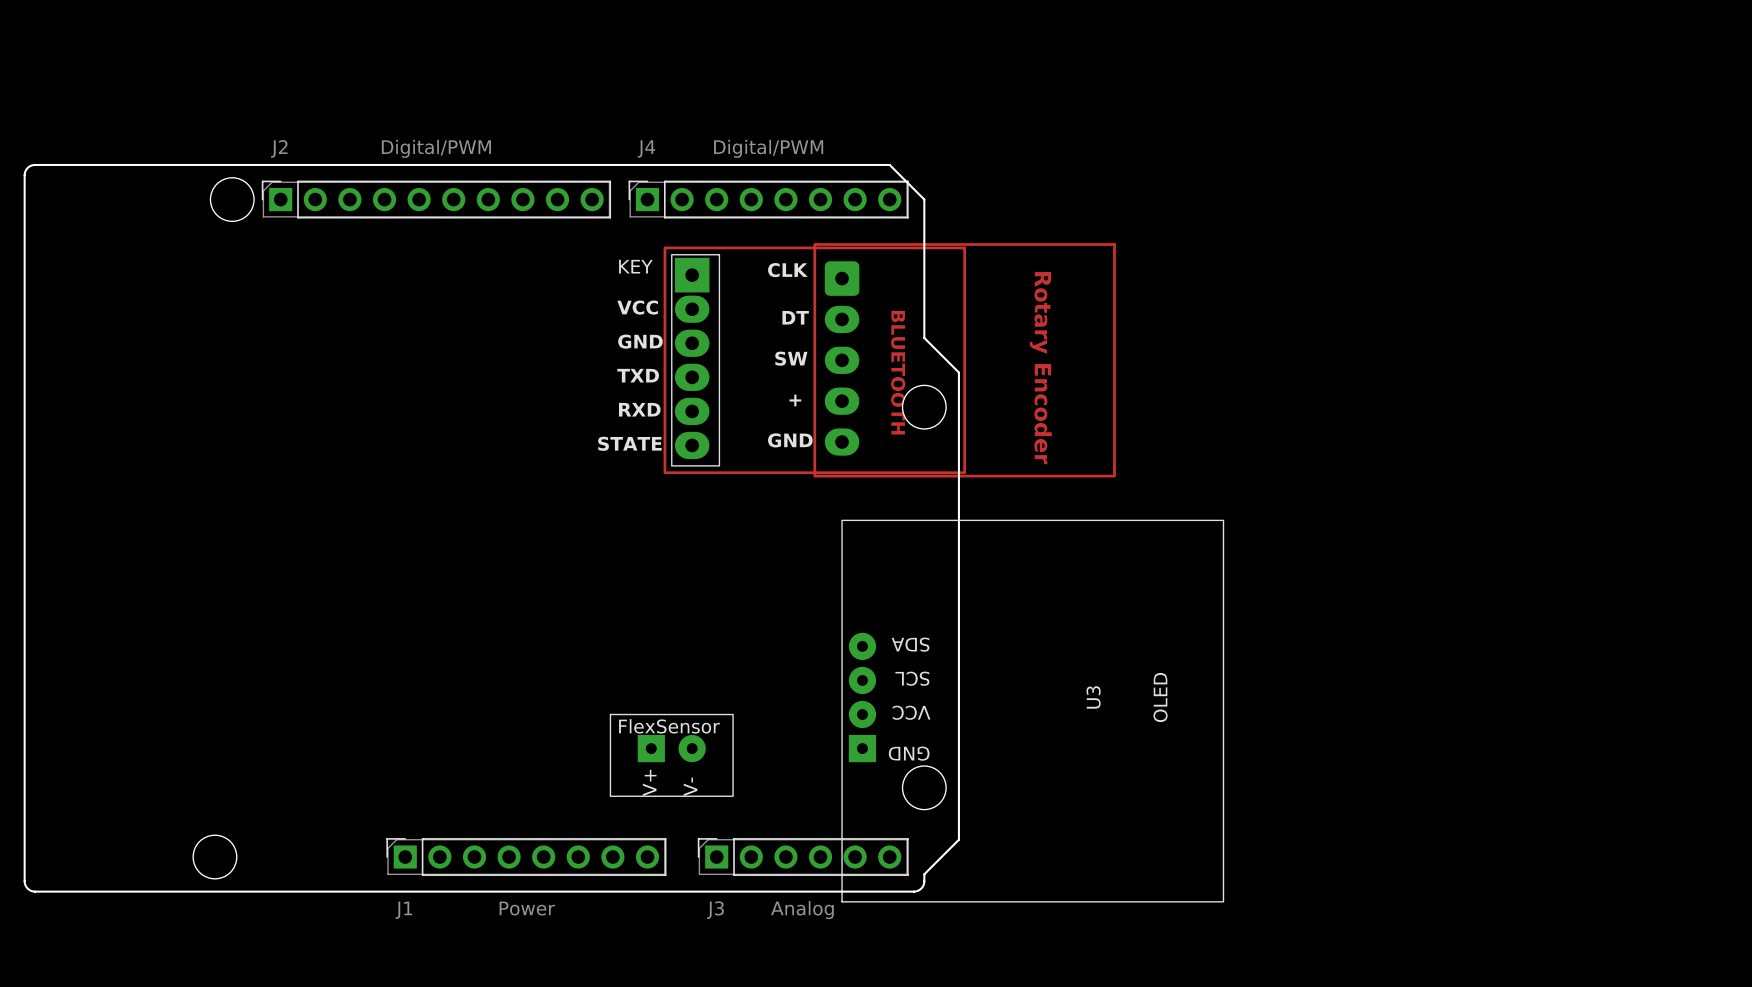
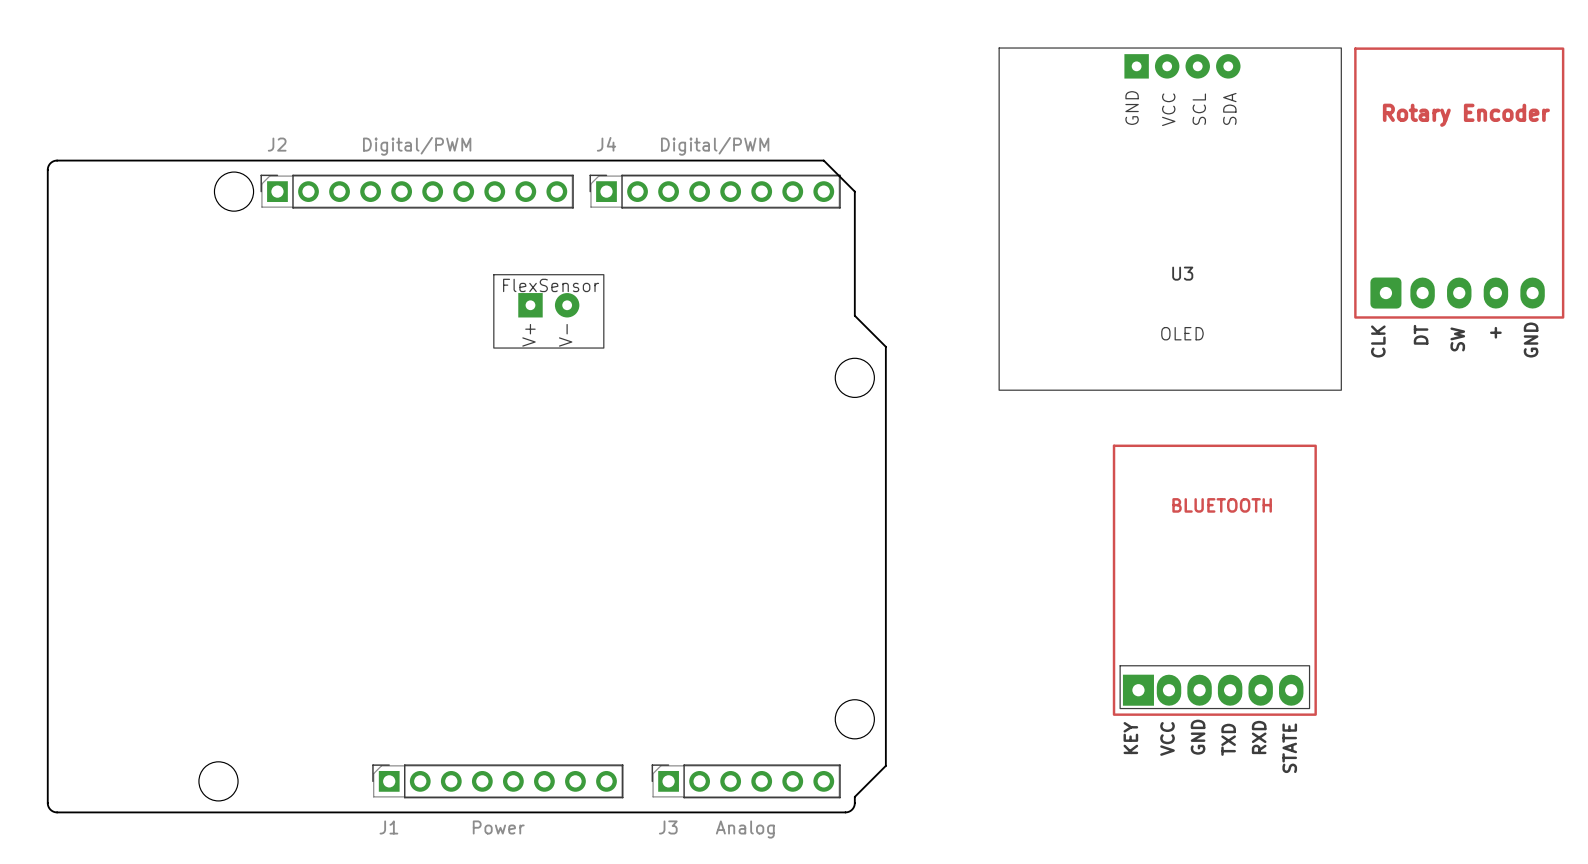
part: none -> (1459, 183)
part: none -> (548, 311)
part: (814, 360) -> none
part: (964, 360) -> none
part: none -> (1214, 580)
U3 rotation: 0° (1032, 711) -> 90° clockwise (1170, 219)
U3 position: (1032, 711) -> (1170, 219)
part: (671, 755) -> none

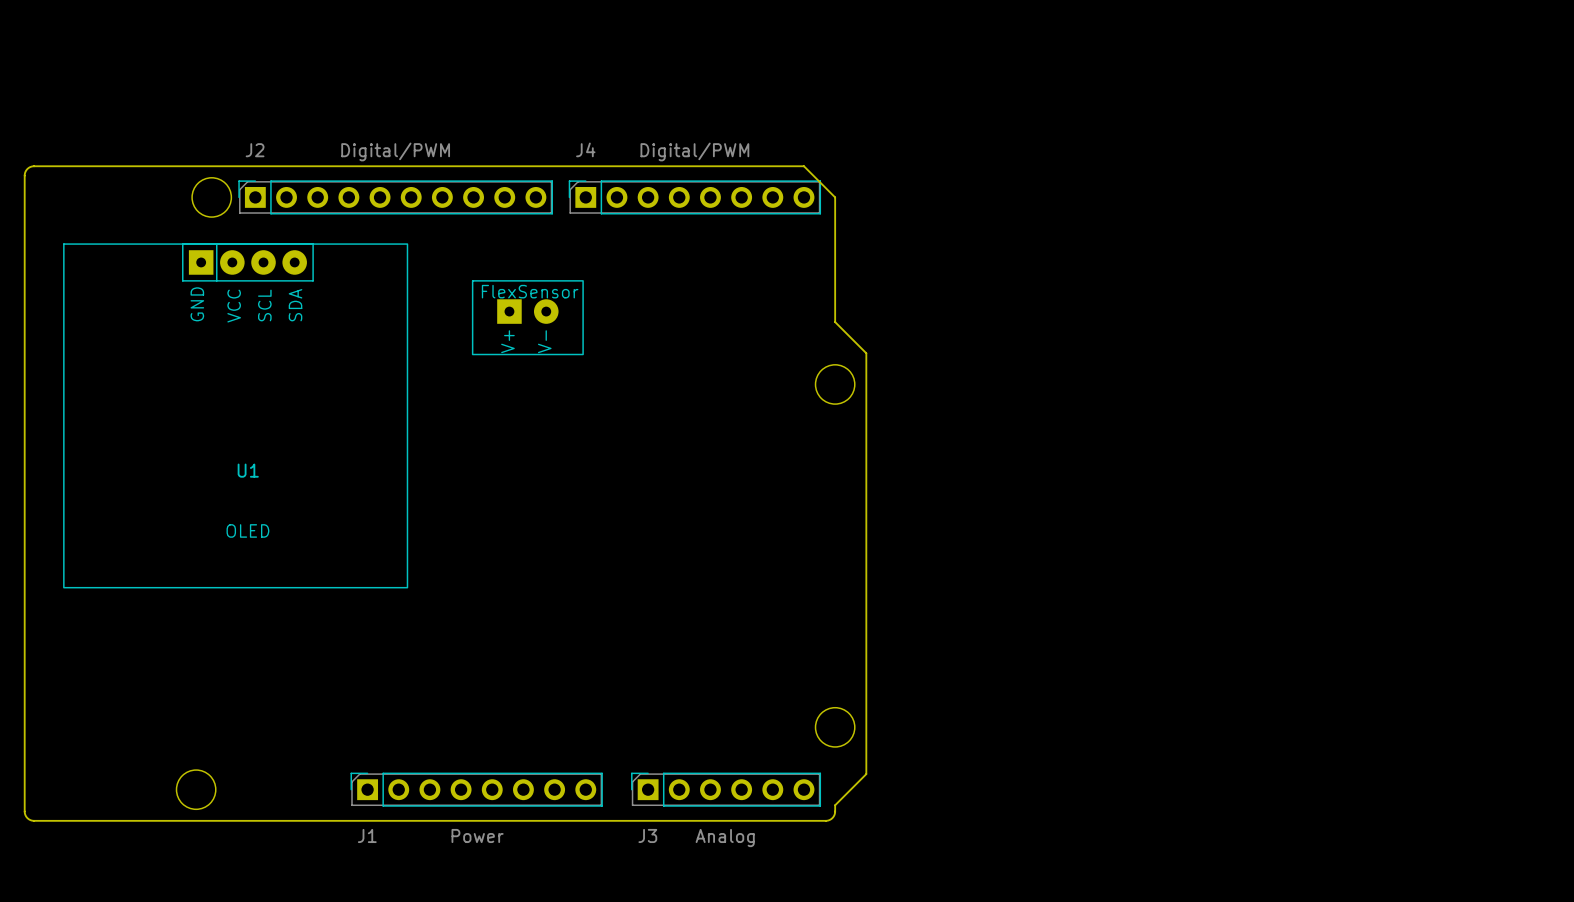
part: (1459, 183) -> none
U3: (1170, 219) -> none
U1: none -> (235, 415)
part: (1214, 580) -> none

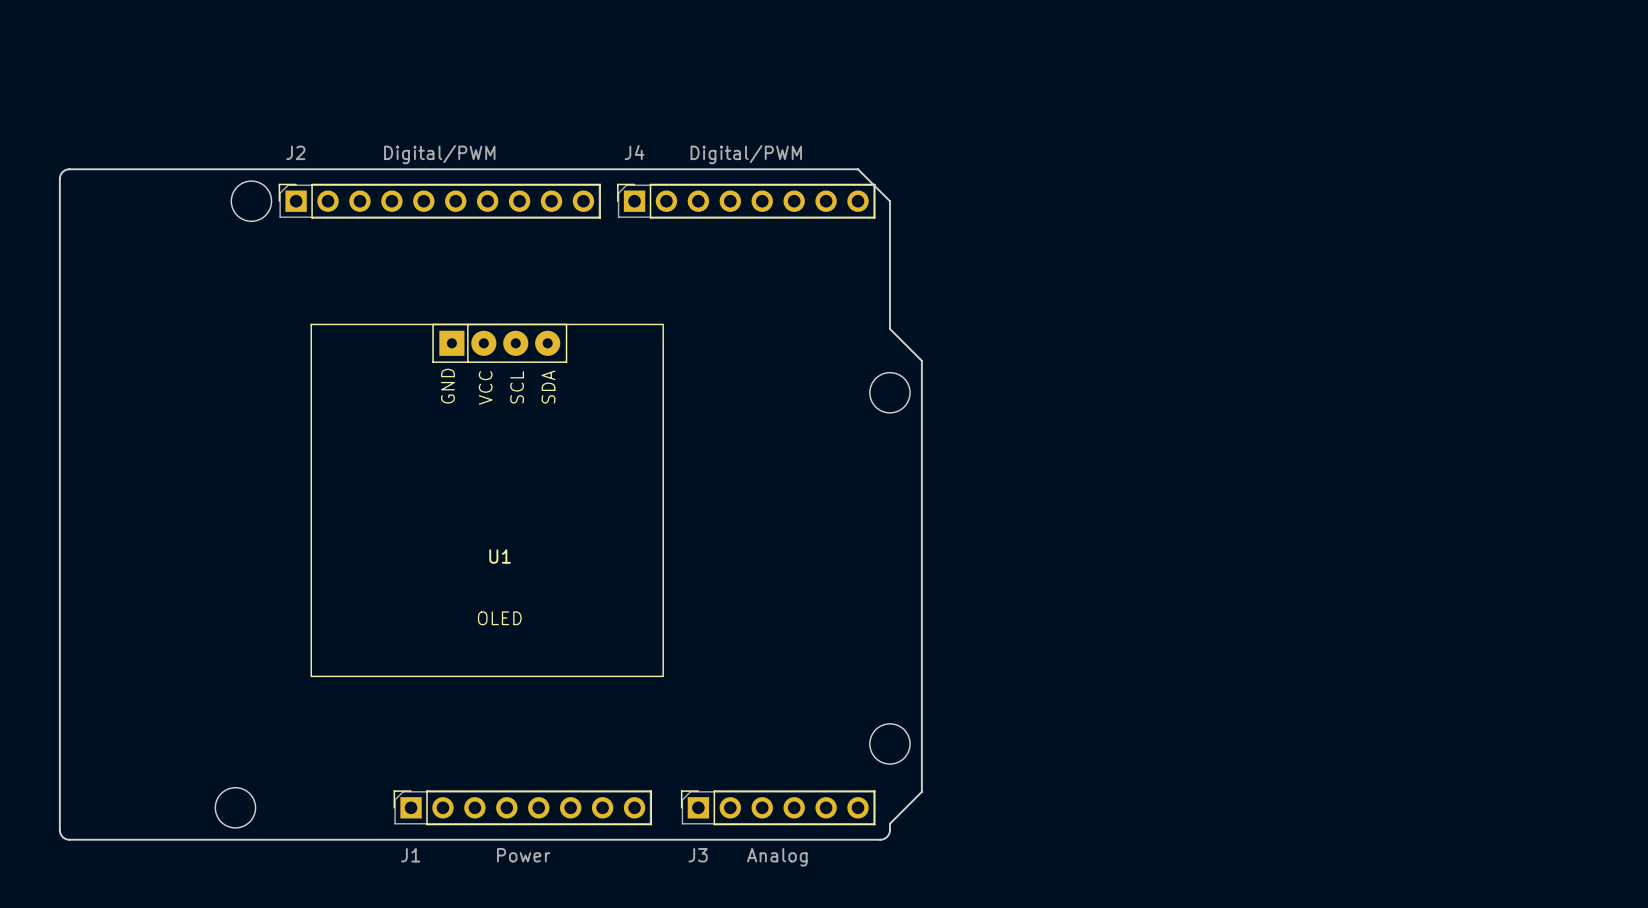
part: (527, 317) -> none
U1 position: (235, 415) -> (487, 500)

